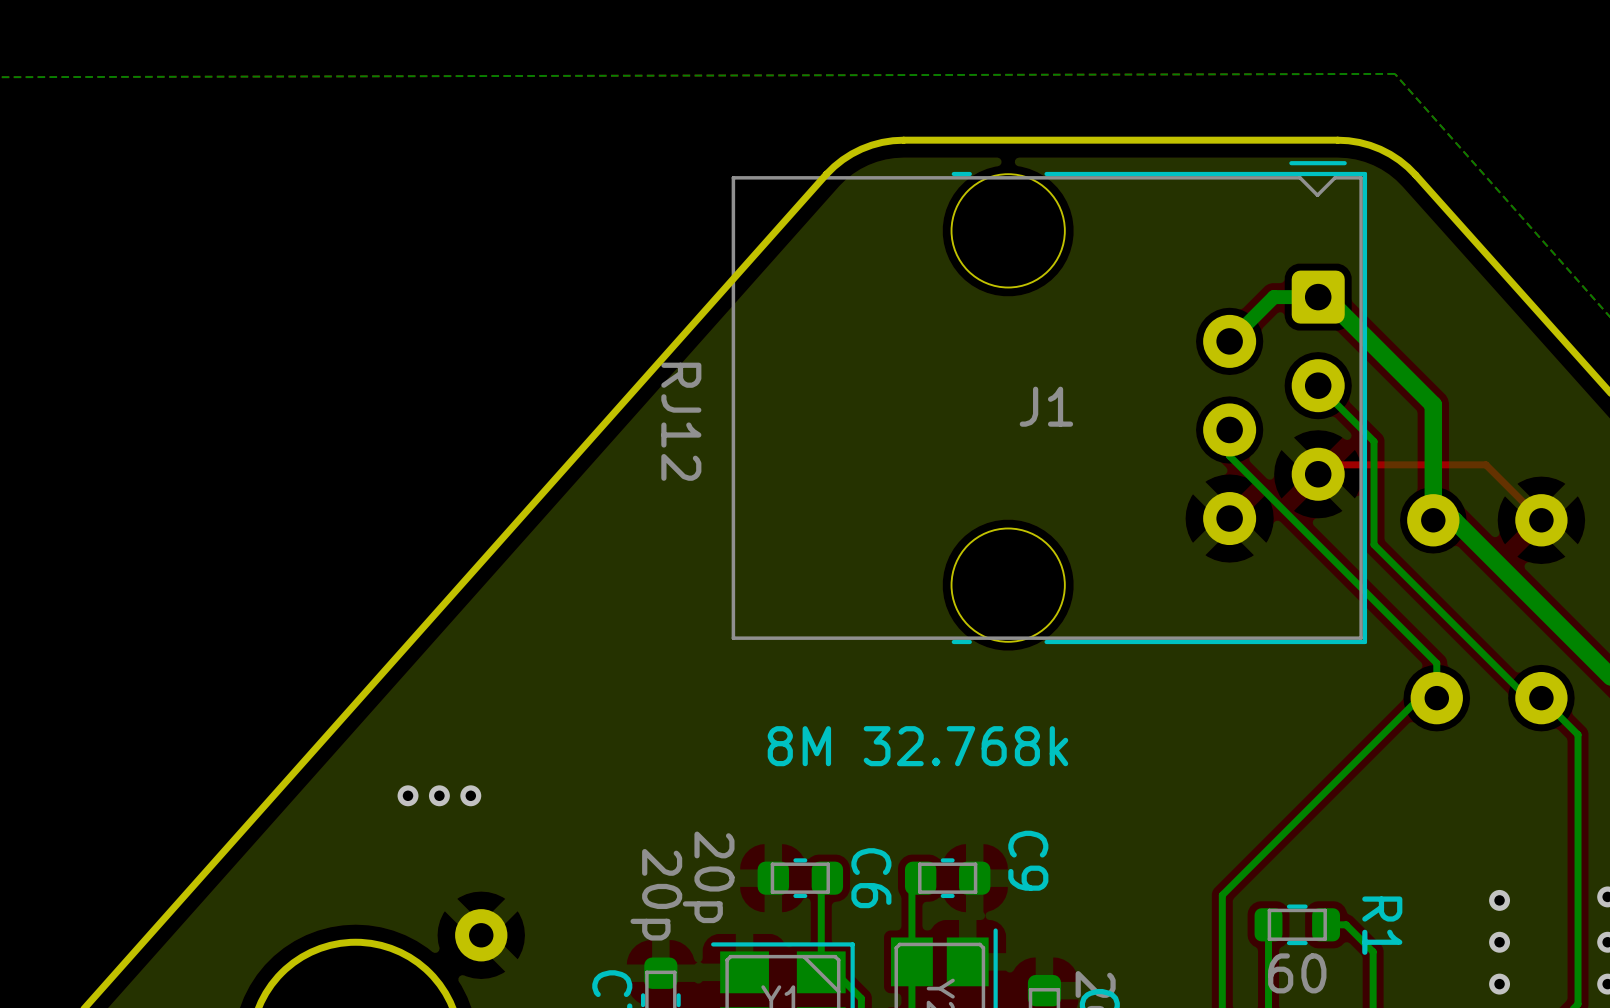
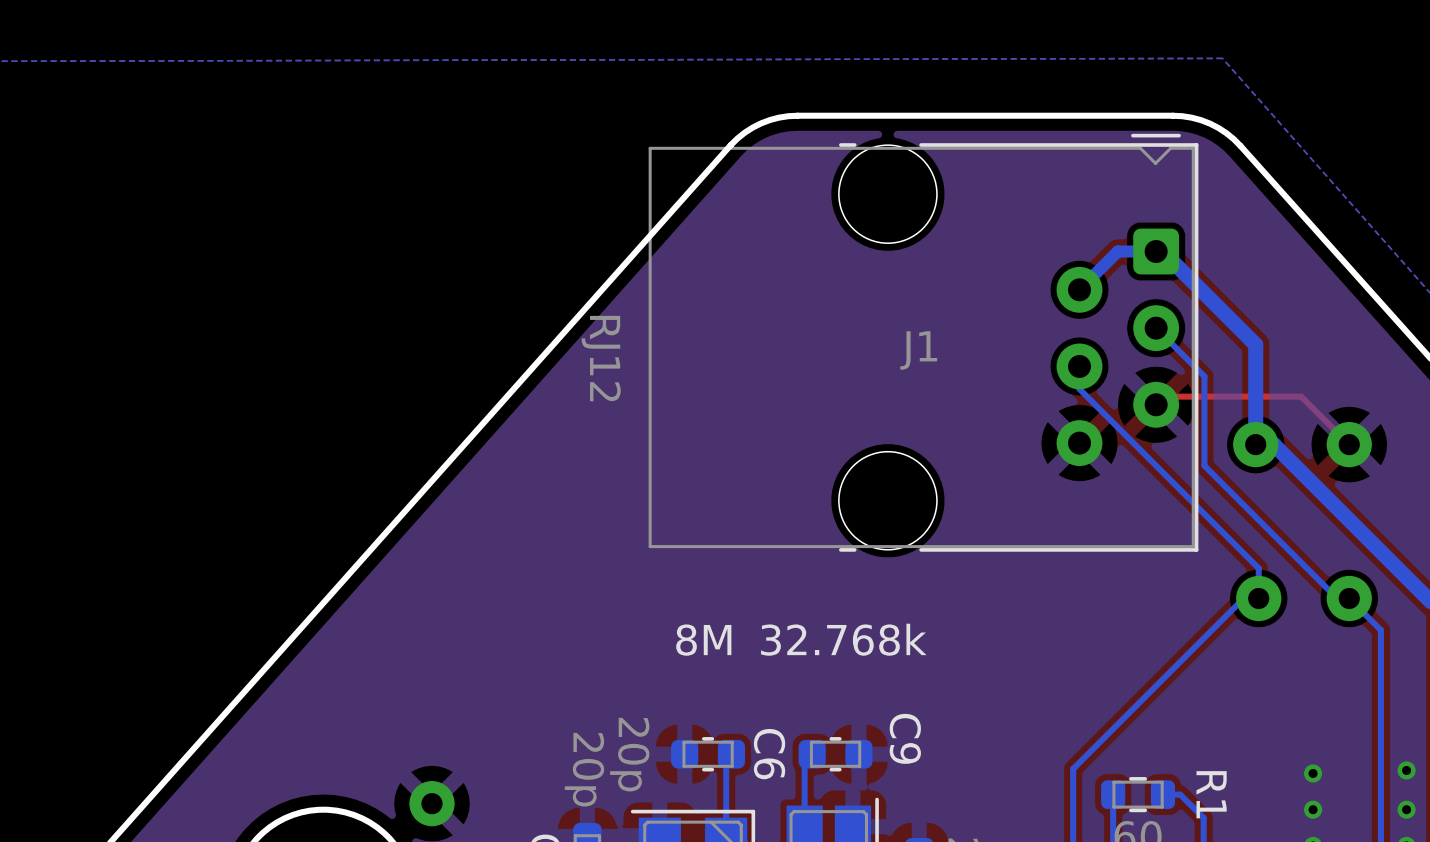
via: (408, 795) -> none
via: (439, 795) -> none
via: (470, 795) -> none

